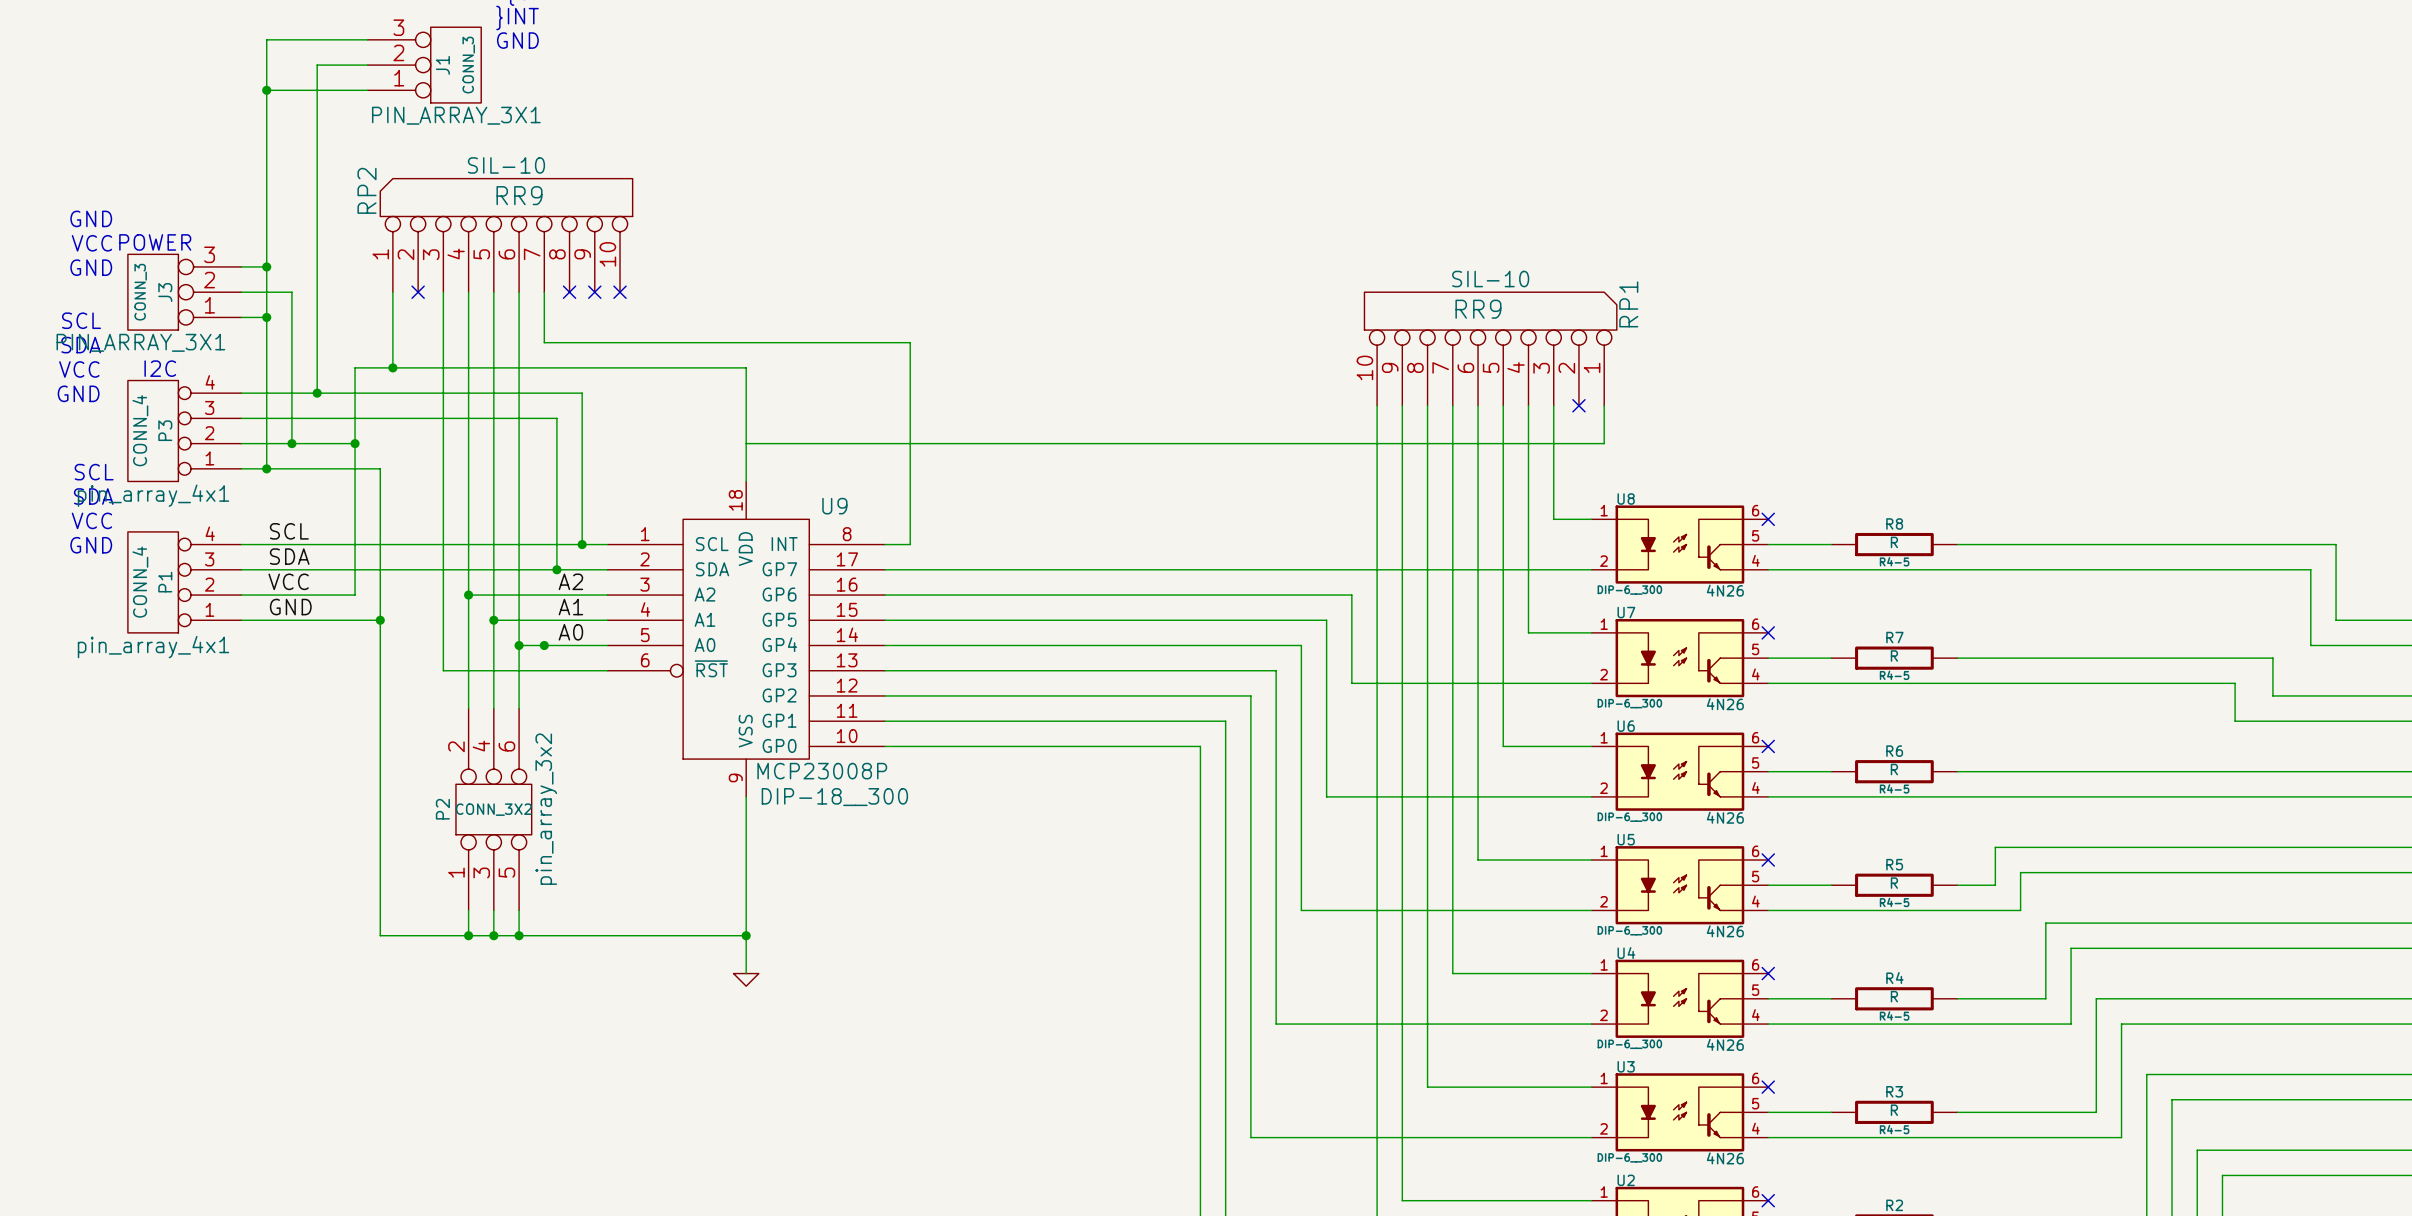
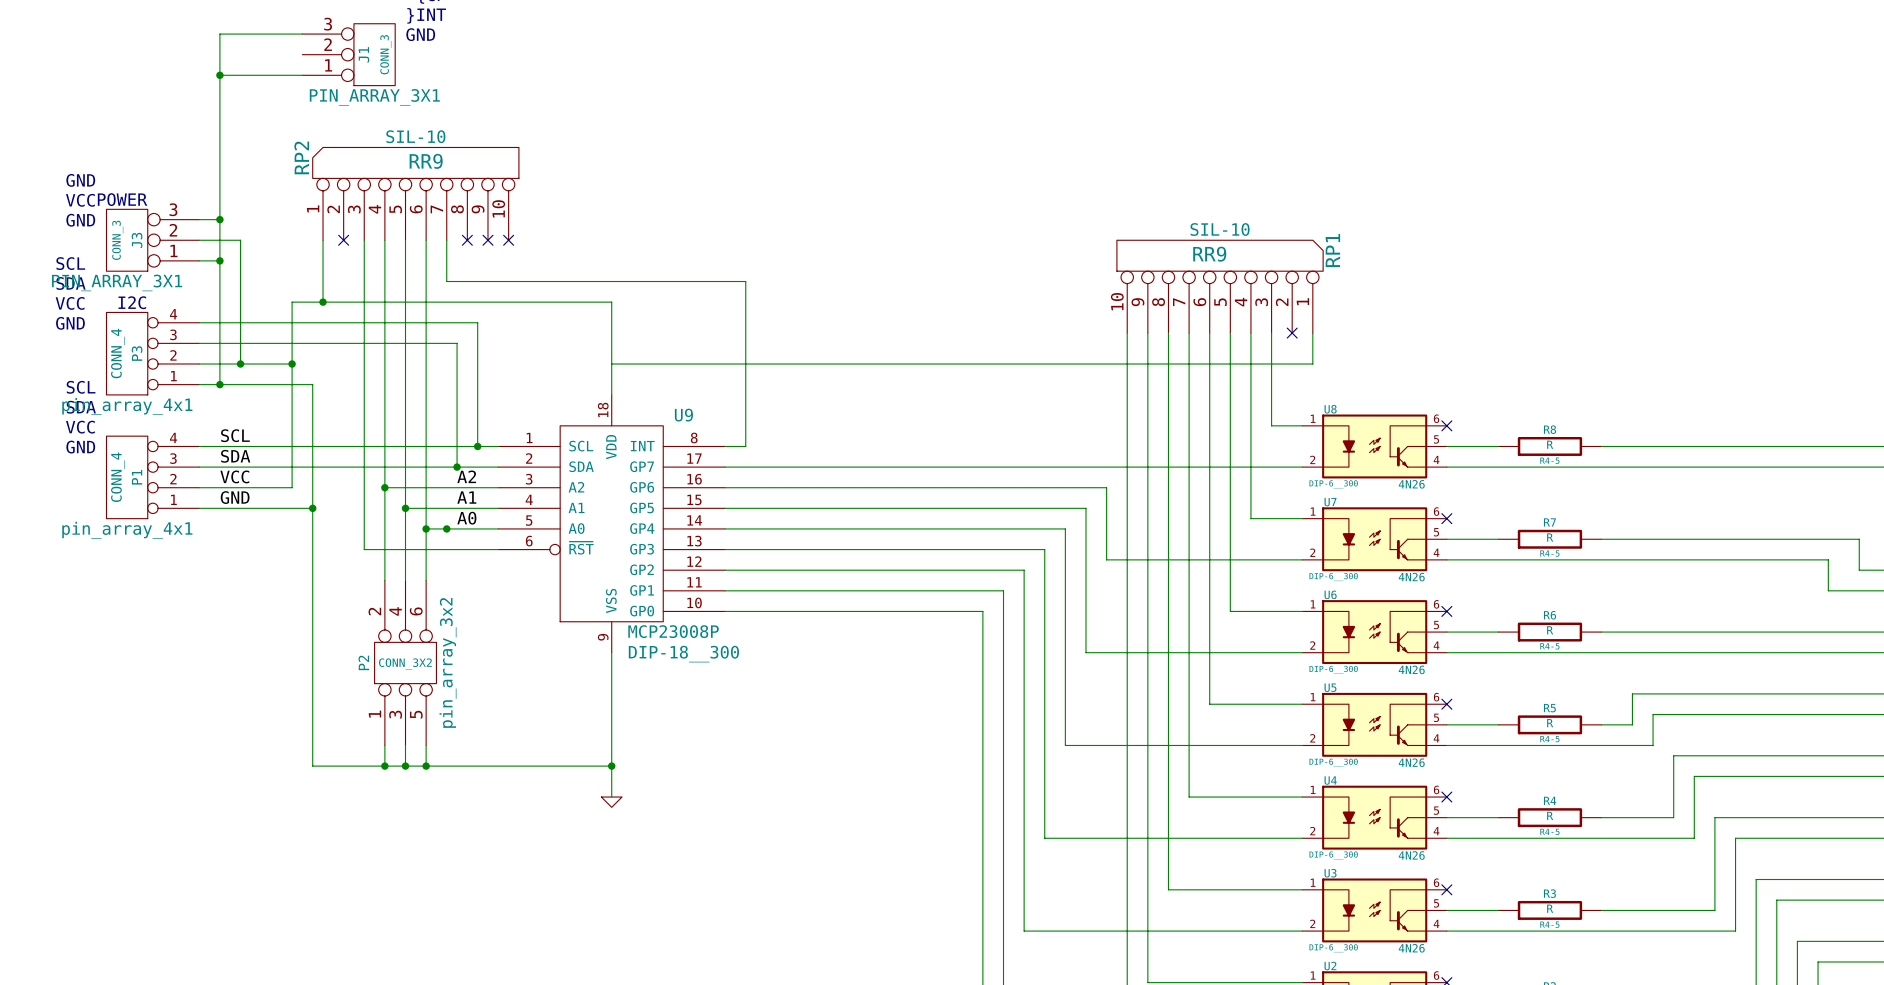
wire: (367, 65) (317, 65) (317, 393) -> none
junction: (317, 393) -> none

